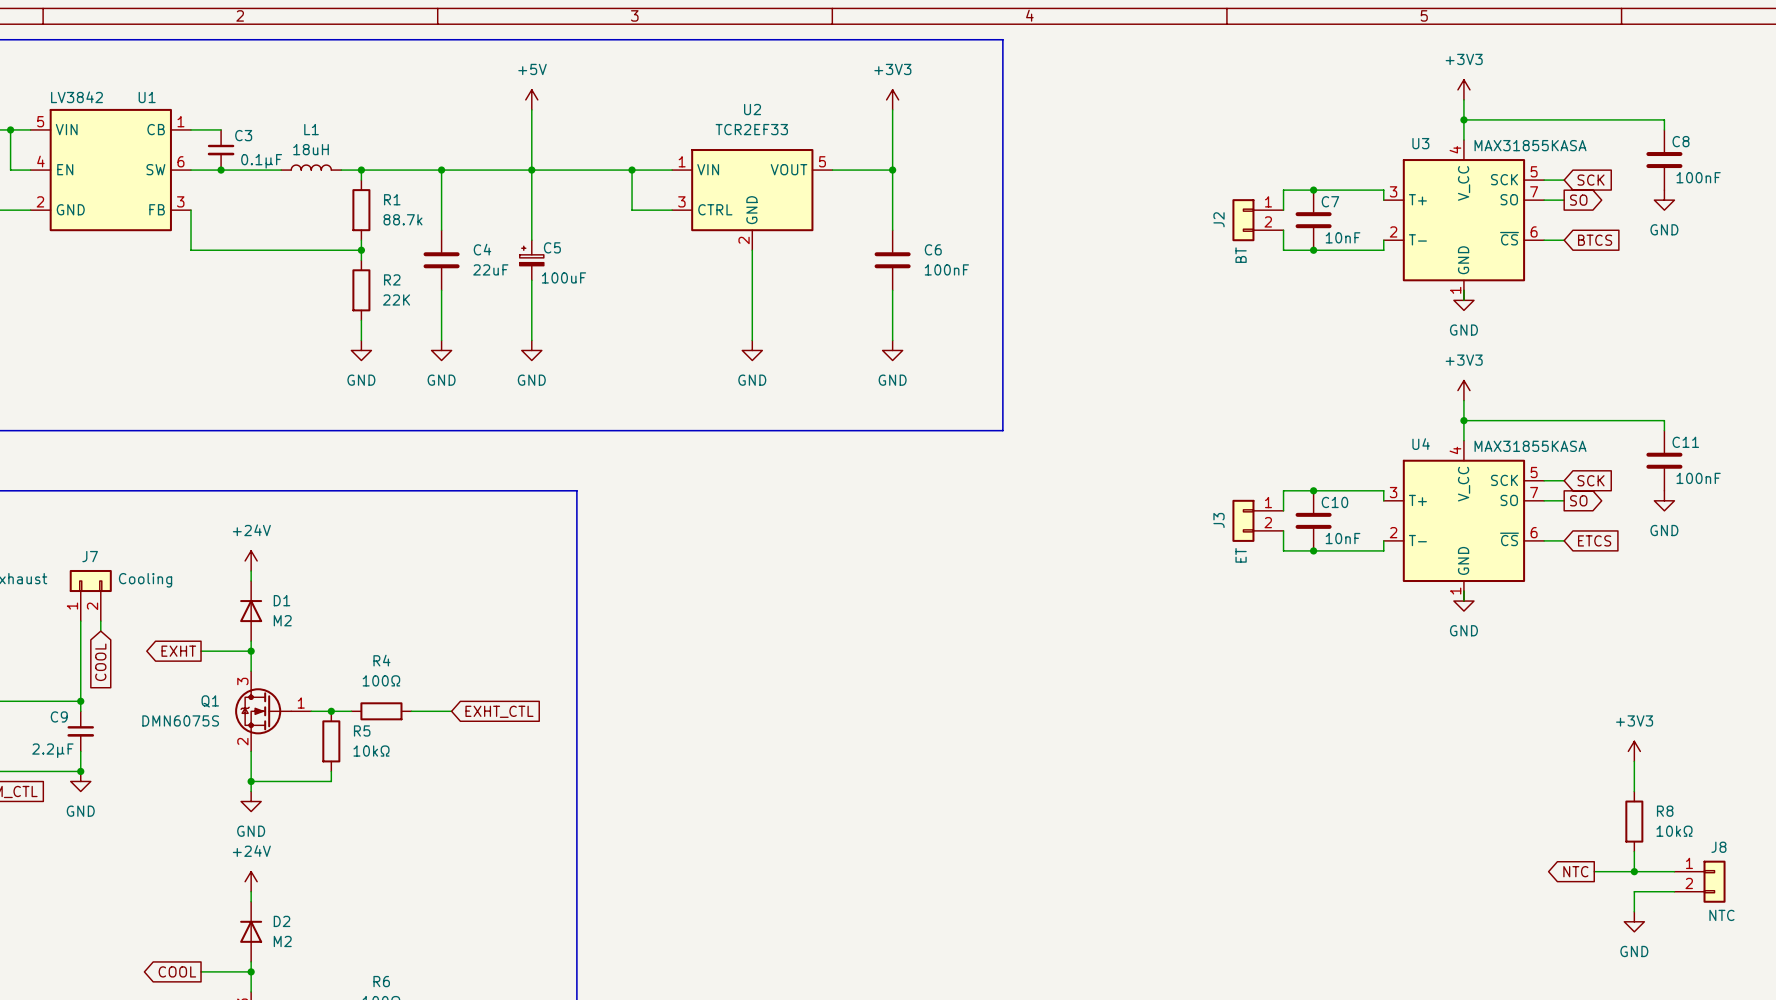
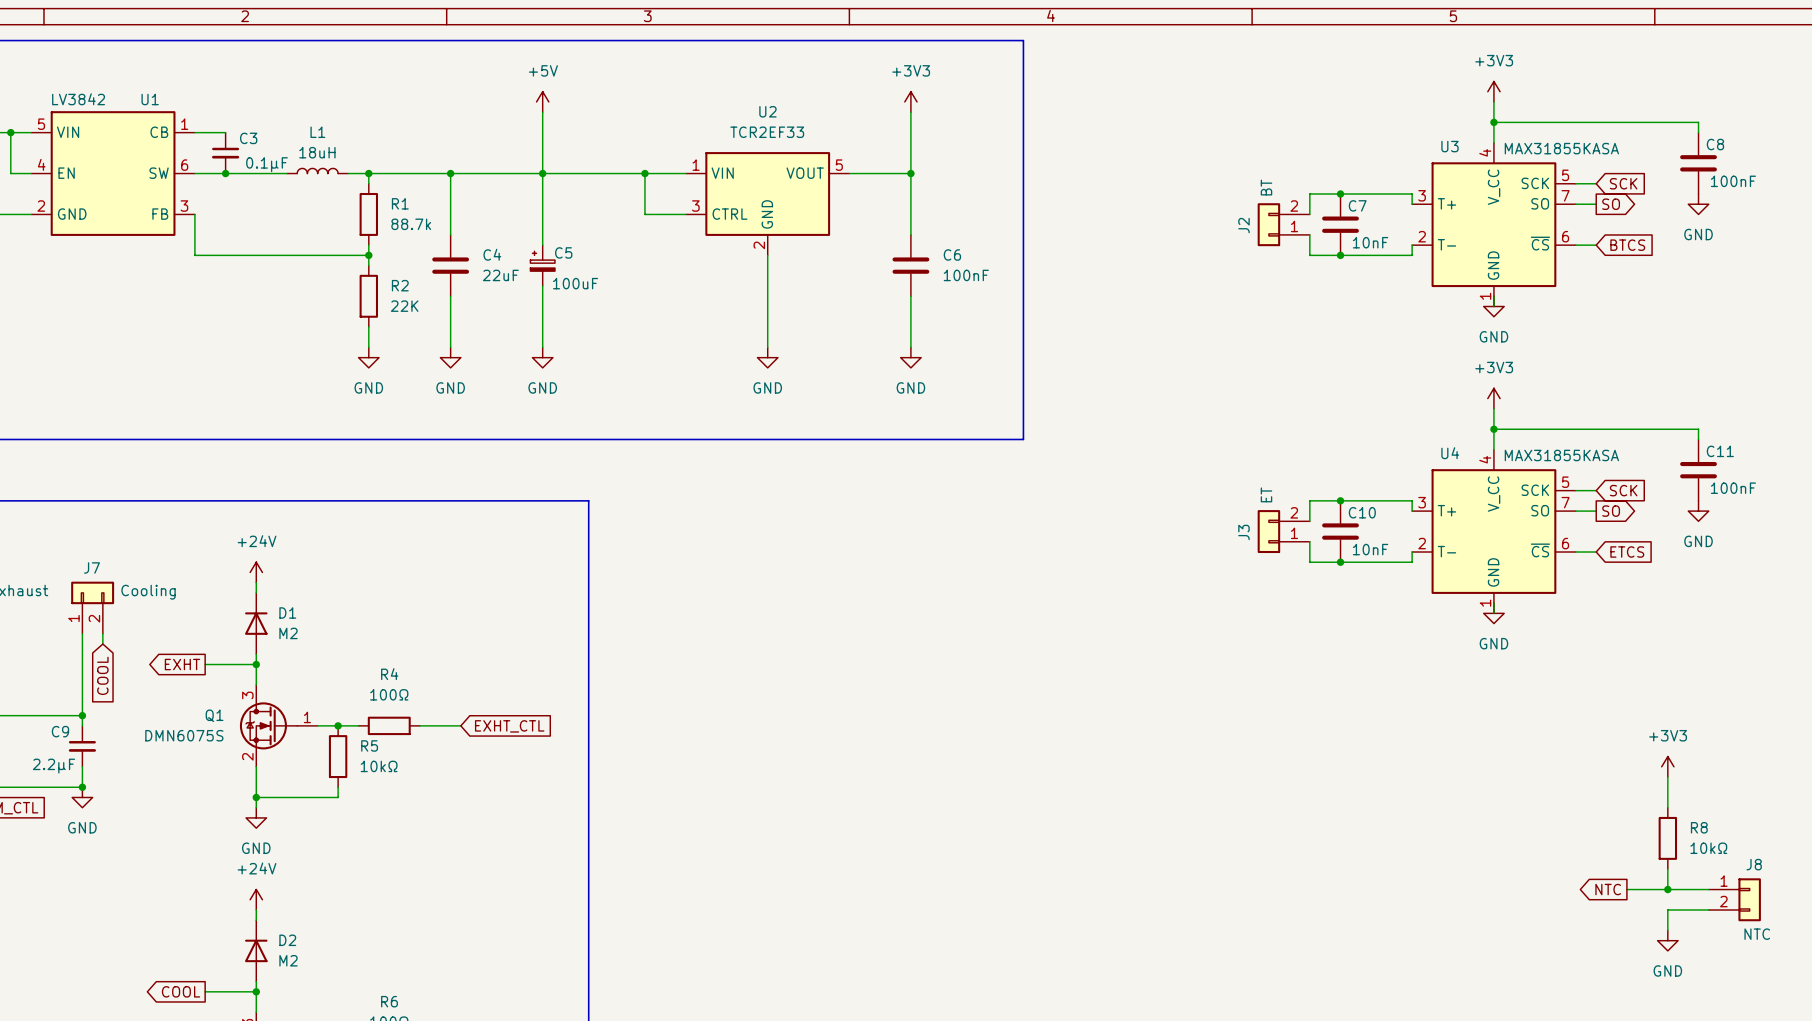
J2 flip: as is (1243, 220) -> up-down (1268, 224)
J3 flip: as is (1243, 520) -> up-down (1268, 531)

